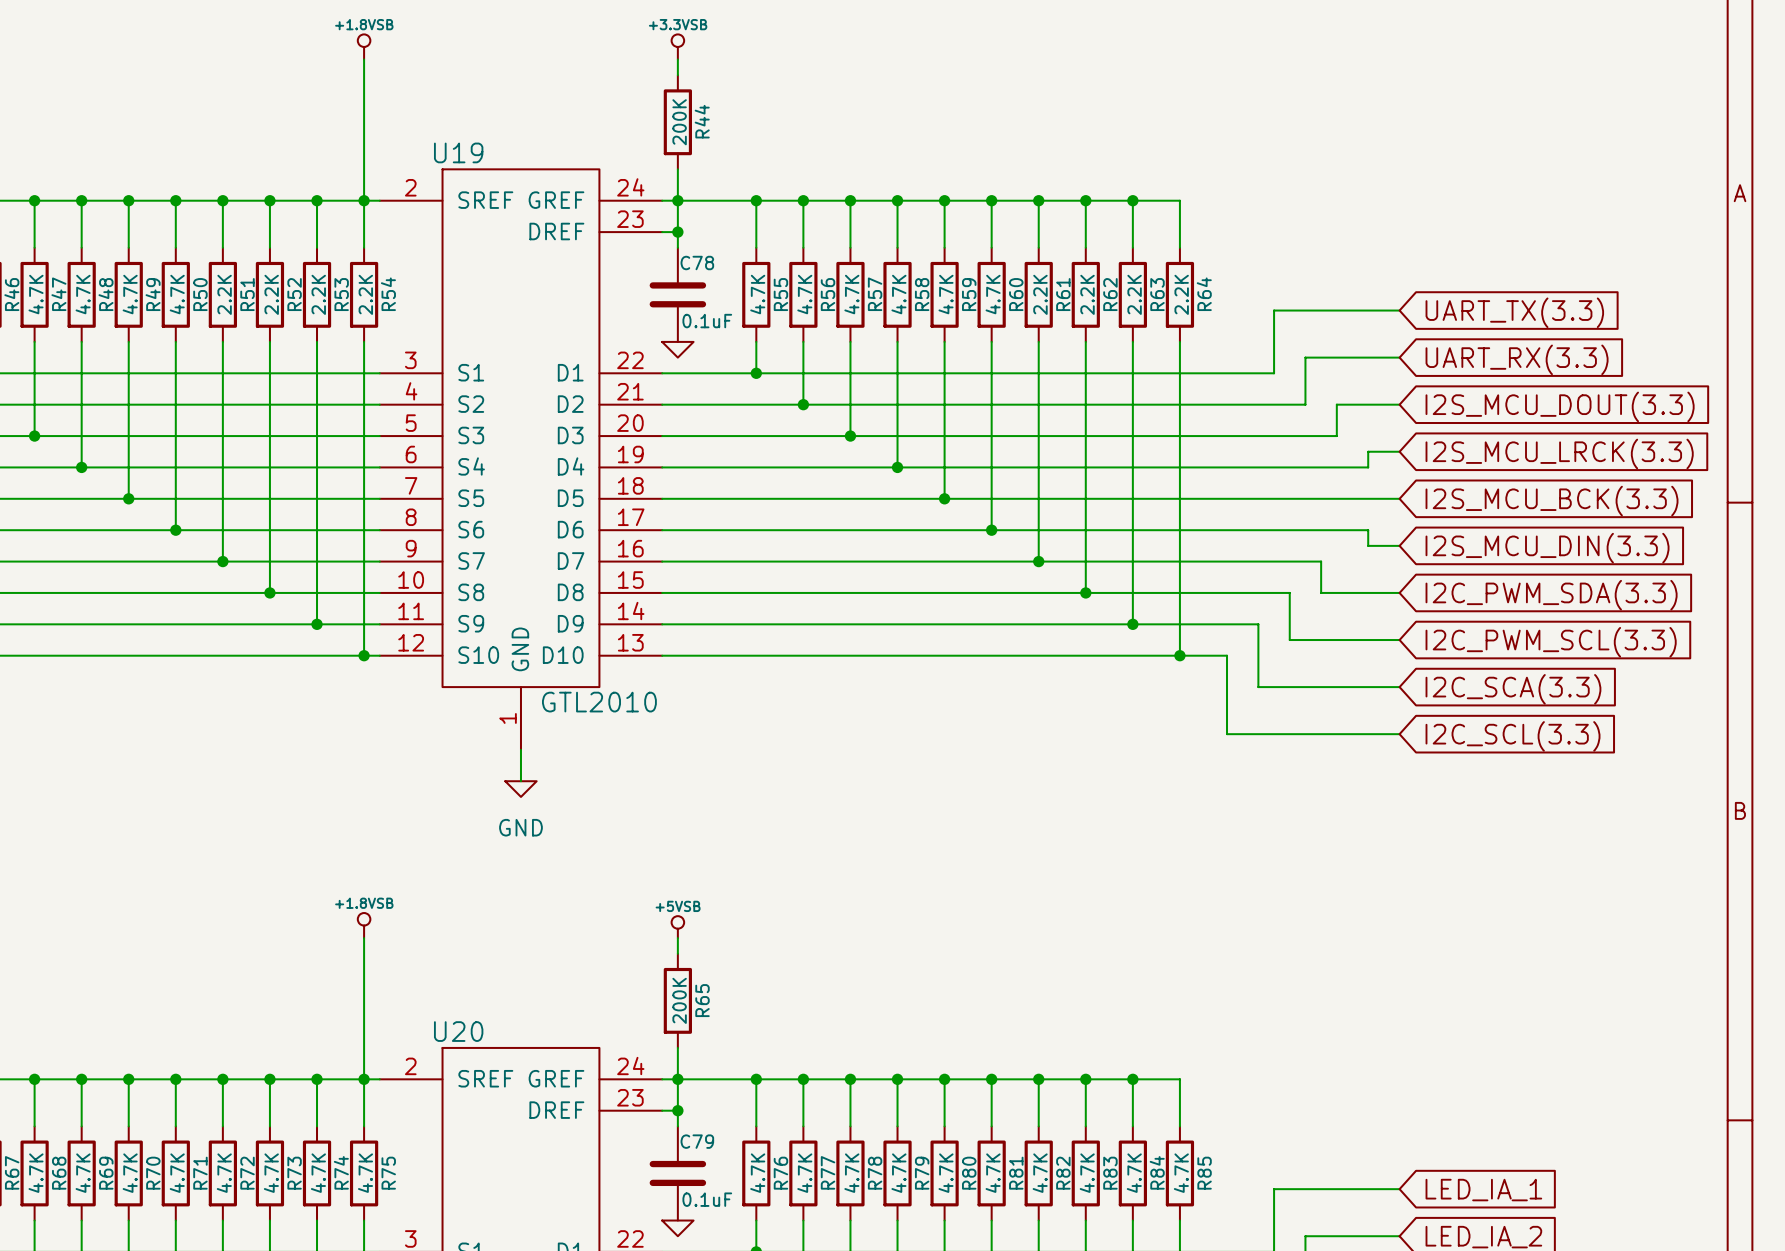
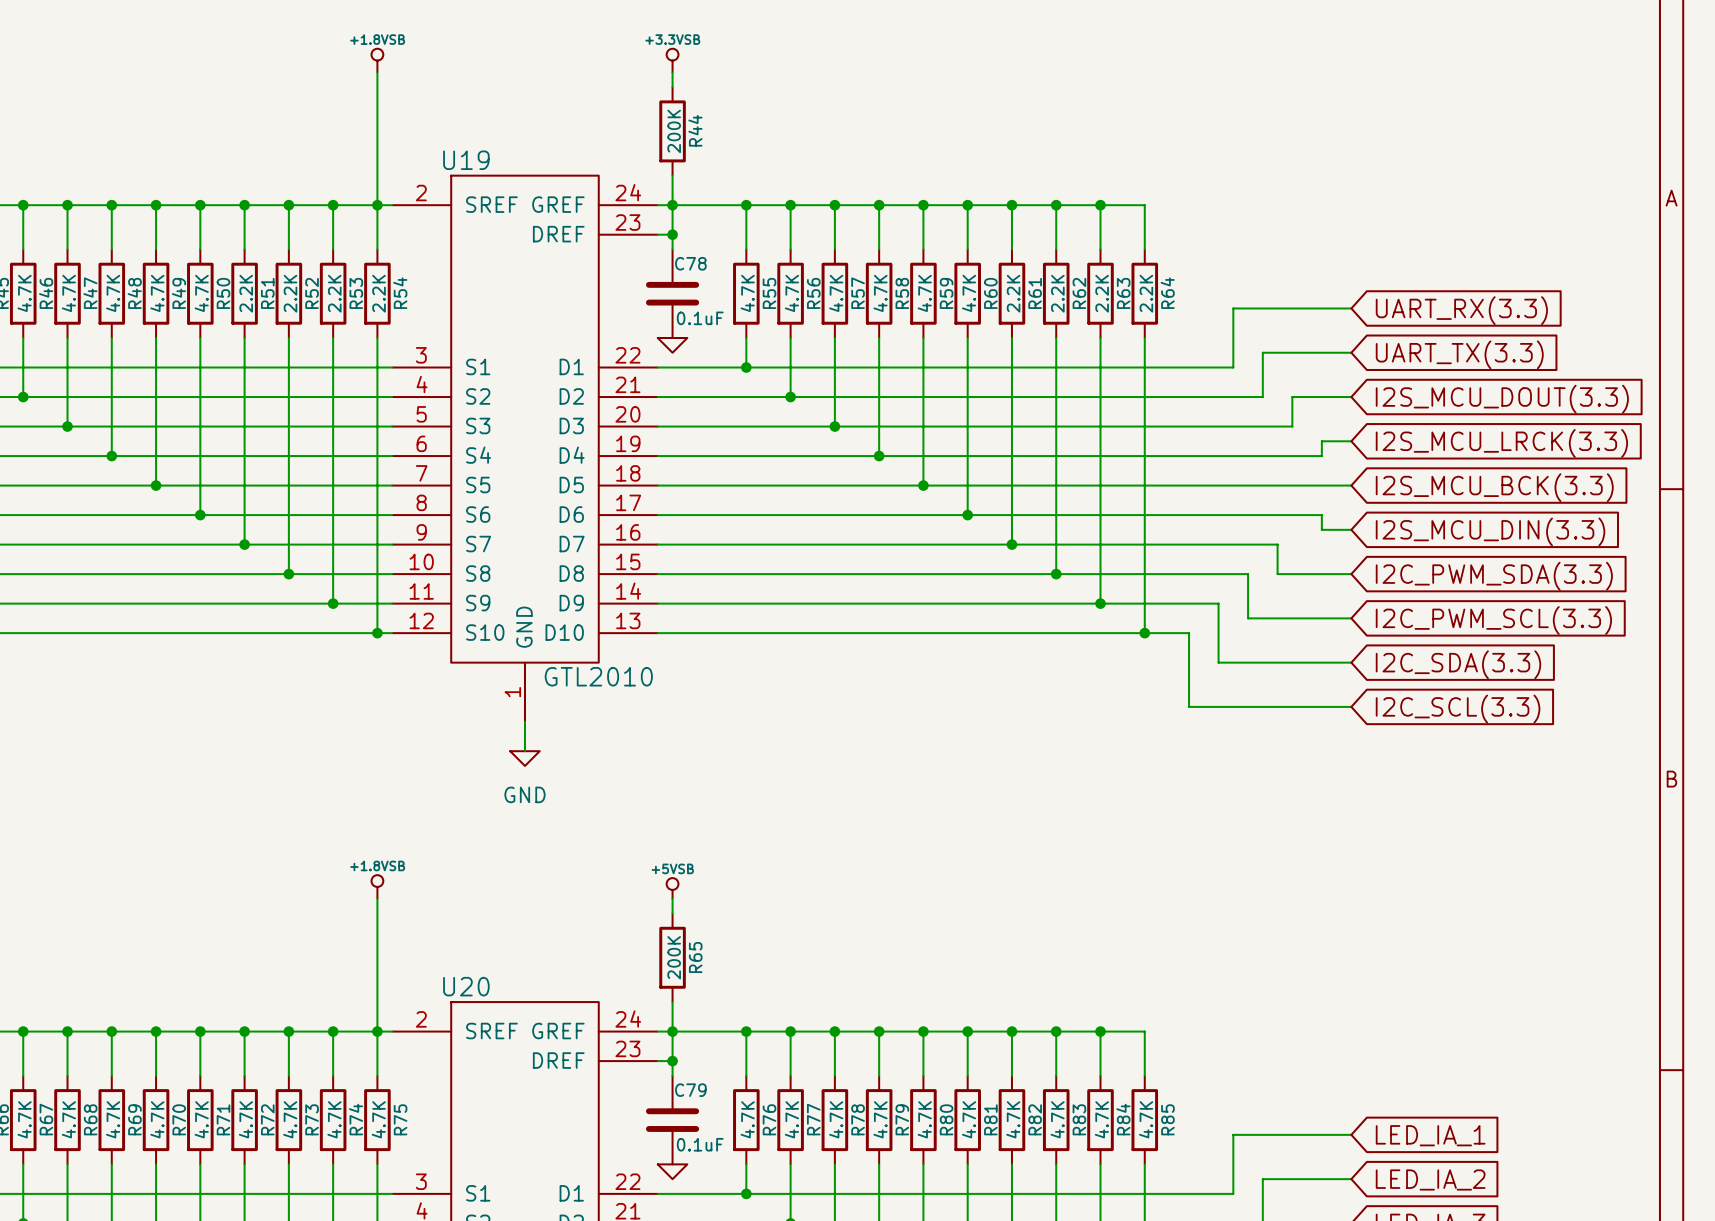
global label: UART_TX(3.3) (1514, 312) -> UART_RX(3.3) (1461, 310)
global label: UART_RX(3.3) (1517, 359) -> UART_TX(3.3) (1459, 354)
global label: I2C_SCA(3.3) (1513, 689) -> I2C_SDA(3.3) (1458, 664)

